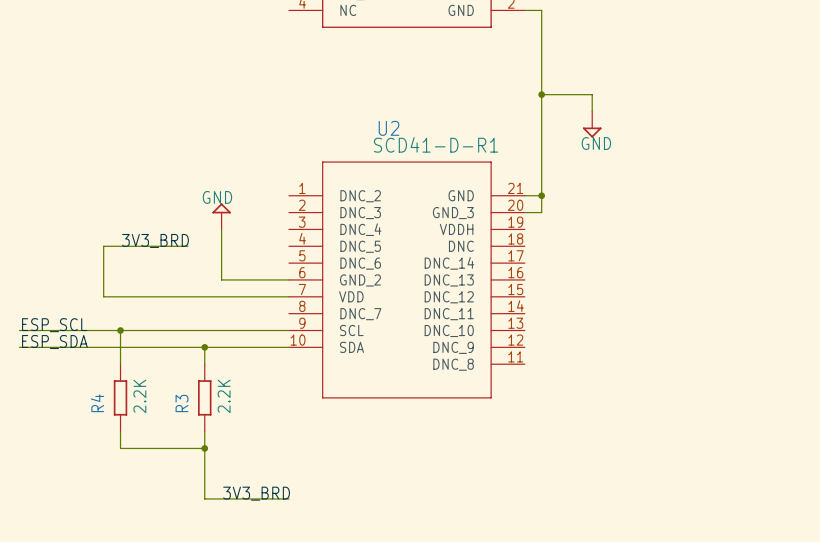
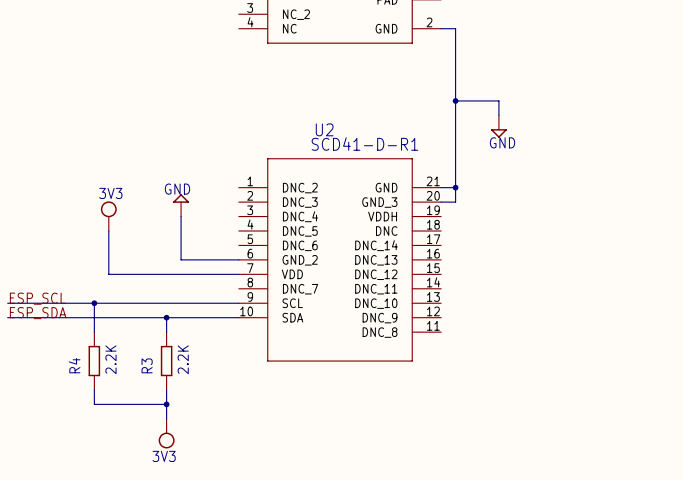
power symbol: none -> 3V3 (108, 216)
label: 3V3_BRD (155, 240) -> none
wire: (187, 246) (103, 246) (103, 296) (137, 296) -> (108, 231) (108, 274)
wire: (204, 465) (204, 498) (288, 498) -> none
power symbol: none -> 3V3 (166, 433)
label: 3V3_BRD (256, 493) -> none

